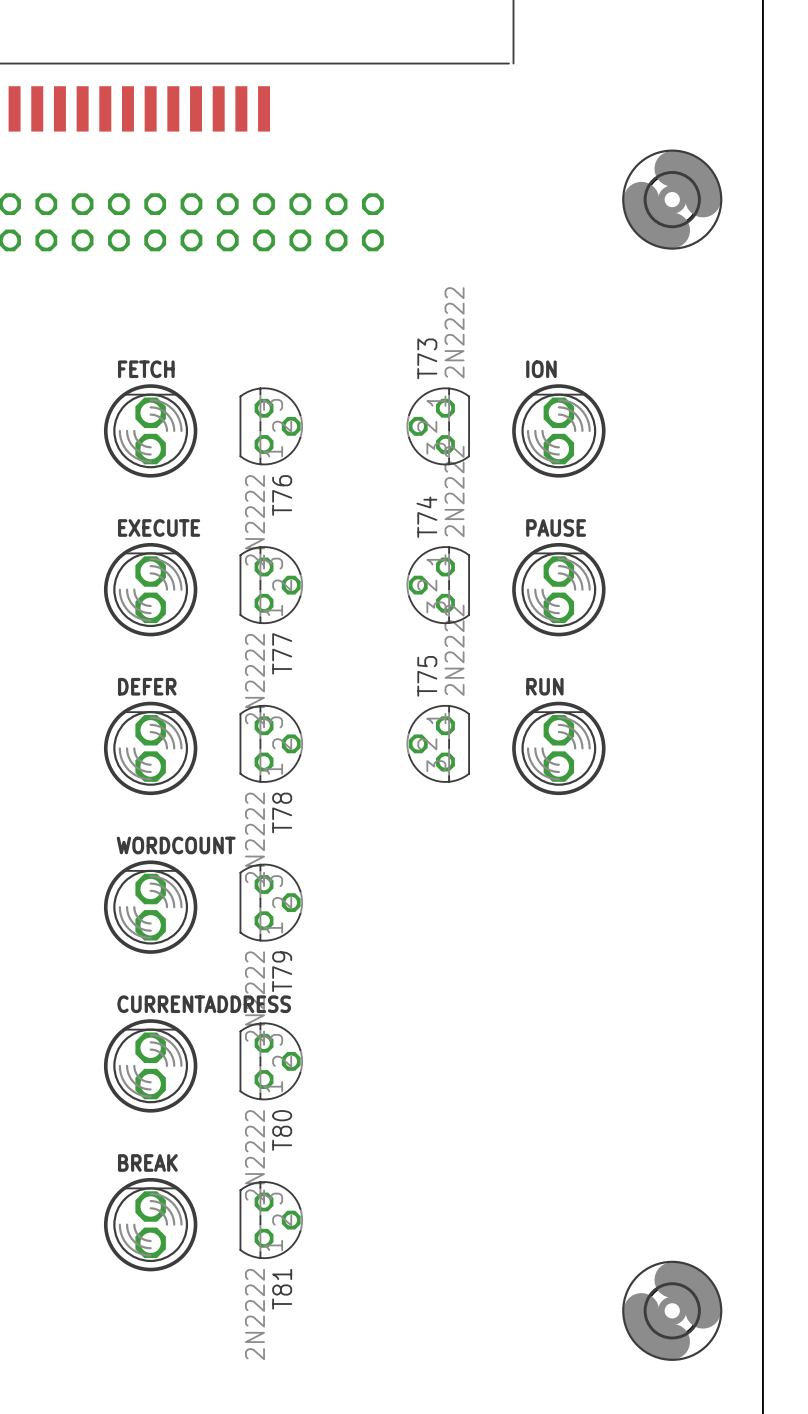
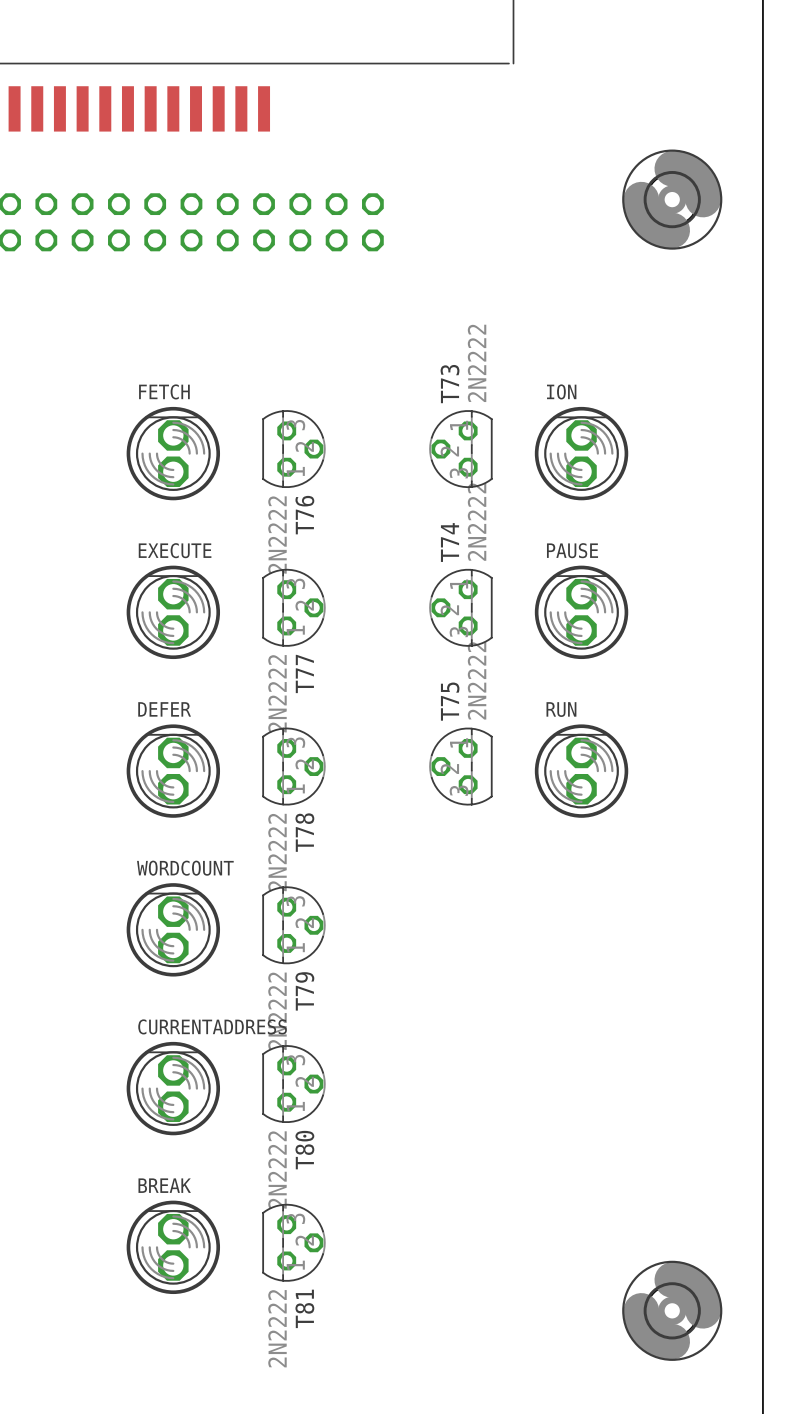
T76 footprint: [239, 387, 304, 466] -> [262, 410, 326, 489]
T73 footprint: [406, 387, 470, 466] -> [429, 410, 493, 489]
FETCH position: (150, 430) -> (173, 453)
ION position: (558, 430) -> (581, 453)
T77 footprint: [239, 546, 304, 625] -> [262, 568, 326, 647]
T74 footprint: [406, 546, 470, 625] -> [429, 568, 493, 647]
EXECUTE position: (150, 589) -> (173, 612)
PAUSE position: (558, 589) -> (581, 612)
T78 position: (271, 743) -> (293, 766)
T75 position: (438, 743) -> (460, 766)
DEFER position: (150, 748) -> (173, 771)
RUN position: (558, 748) -> (581, 771)
T79 position: (271, 902) -> (293, 925)
WORDCOUNT position: (150, 907) -> (173, 929)
T80 footprint: [239, 1022, 304, 1101] -> [262, 1045, 326, 1123]
CURRENTADDRESS position: (150, 1065) -> (173, 1088)
T81 footprint: [239, 1181, 304, 1260] -> [262, 1203, 326, 1282]
BREAK position: (150, 1224) -> (173, 1247)

